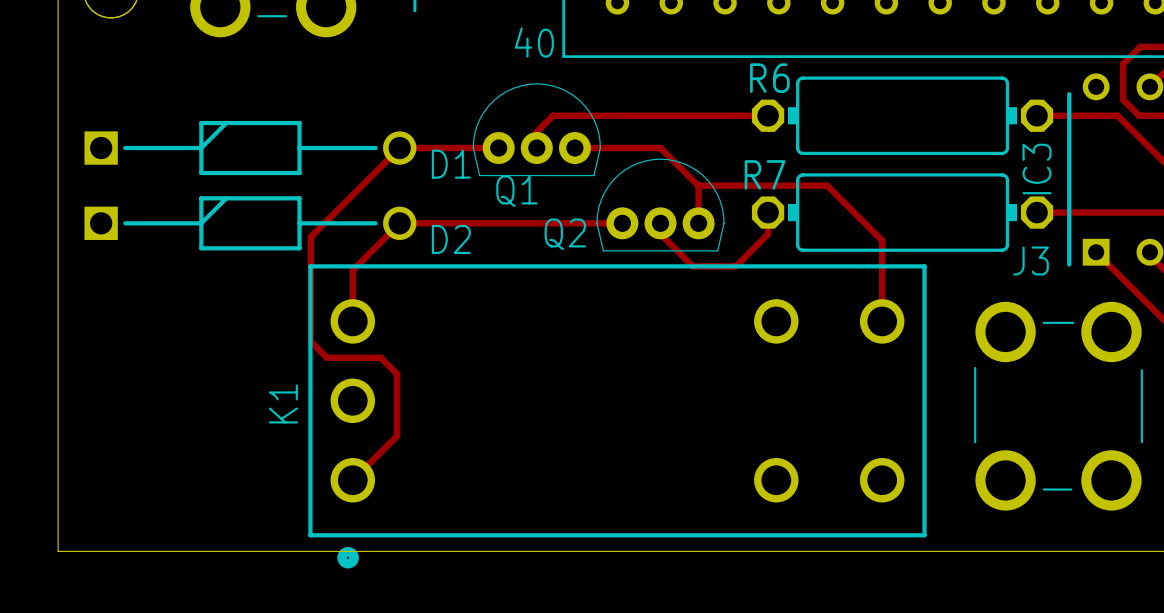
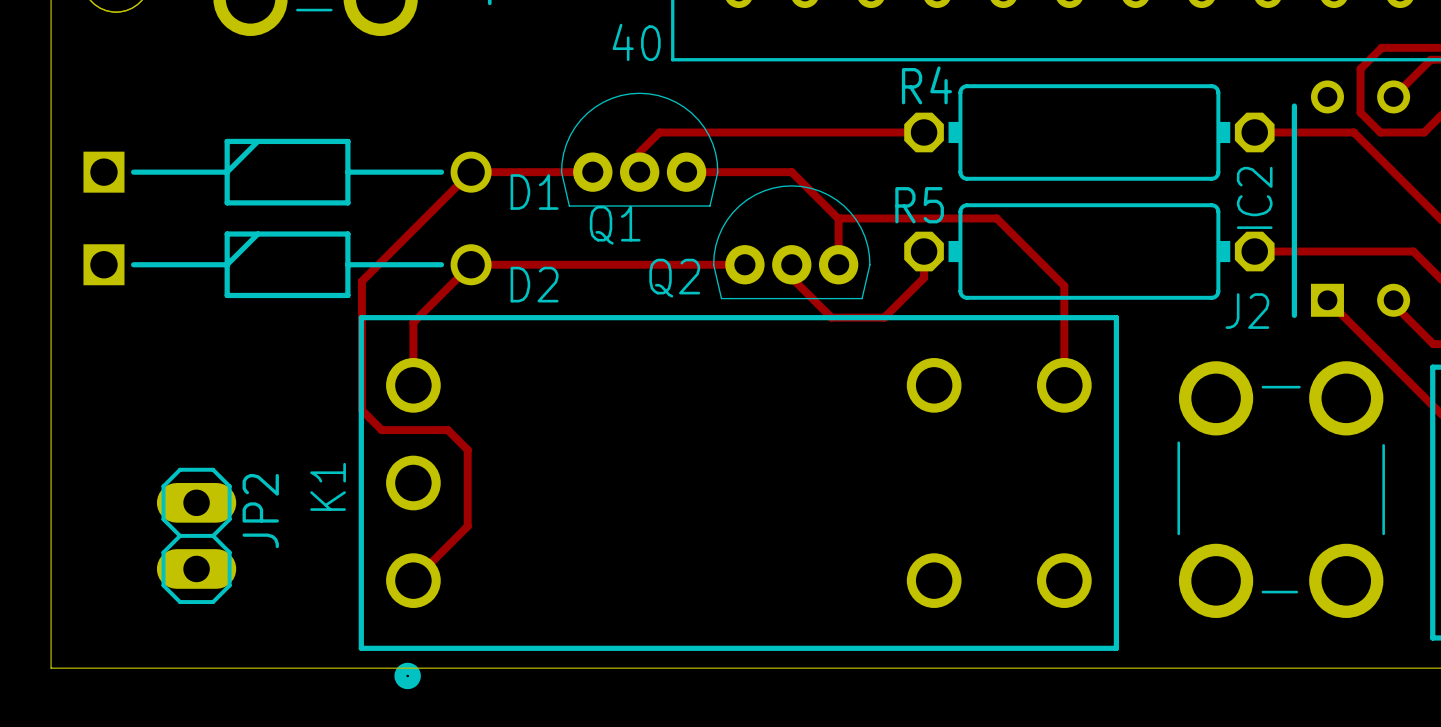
R6 name: R6 (769, 78) -> R4 (926, 85)
IC3 name: IC3 (1037, 168) -> IC2 (1254, 197)
R7 name: R7 (765, 174) -> R5 (919, 205)
J3 name: J3 (1031, 260) -> J2 (1247, 311)
JP2: none -> (196, 535)

